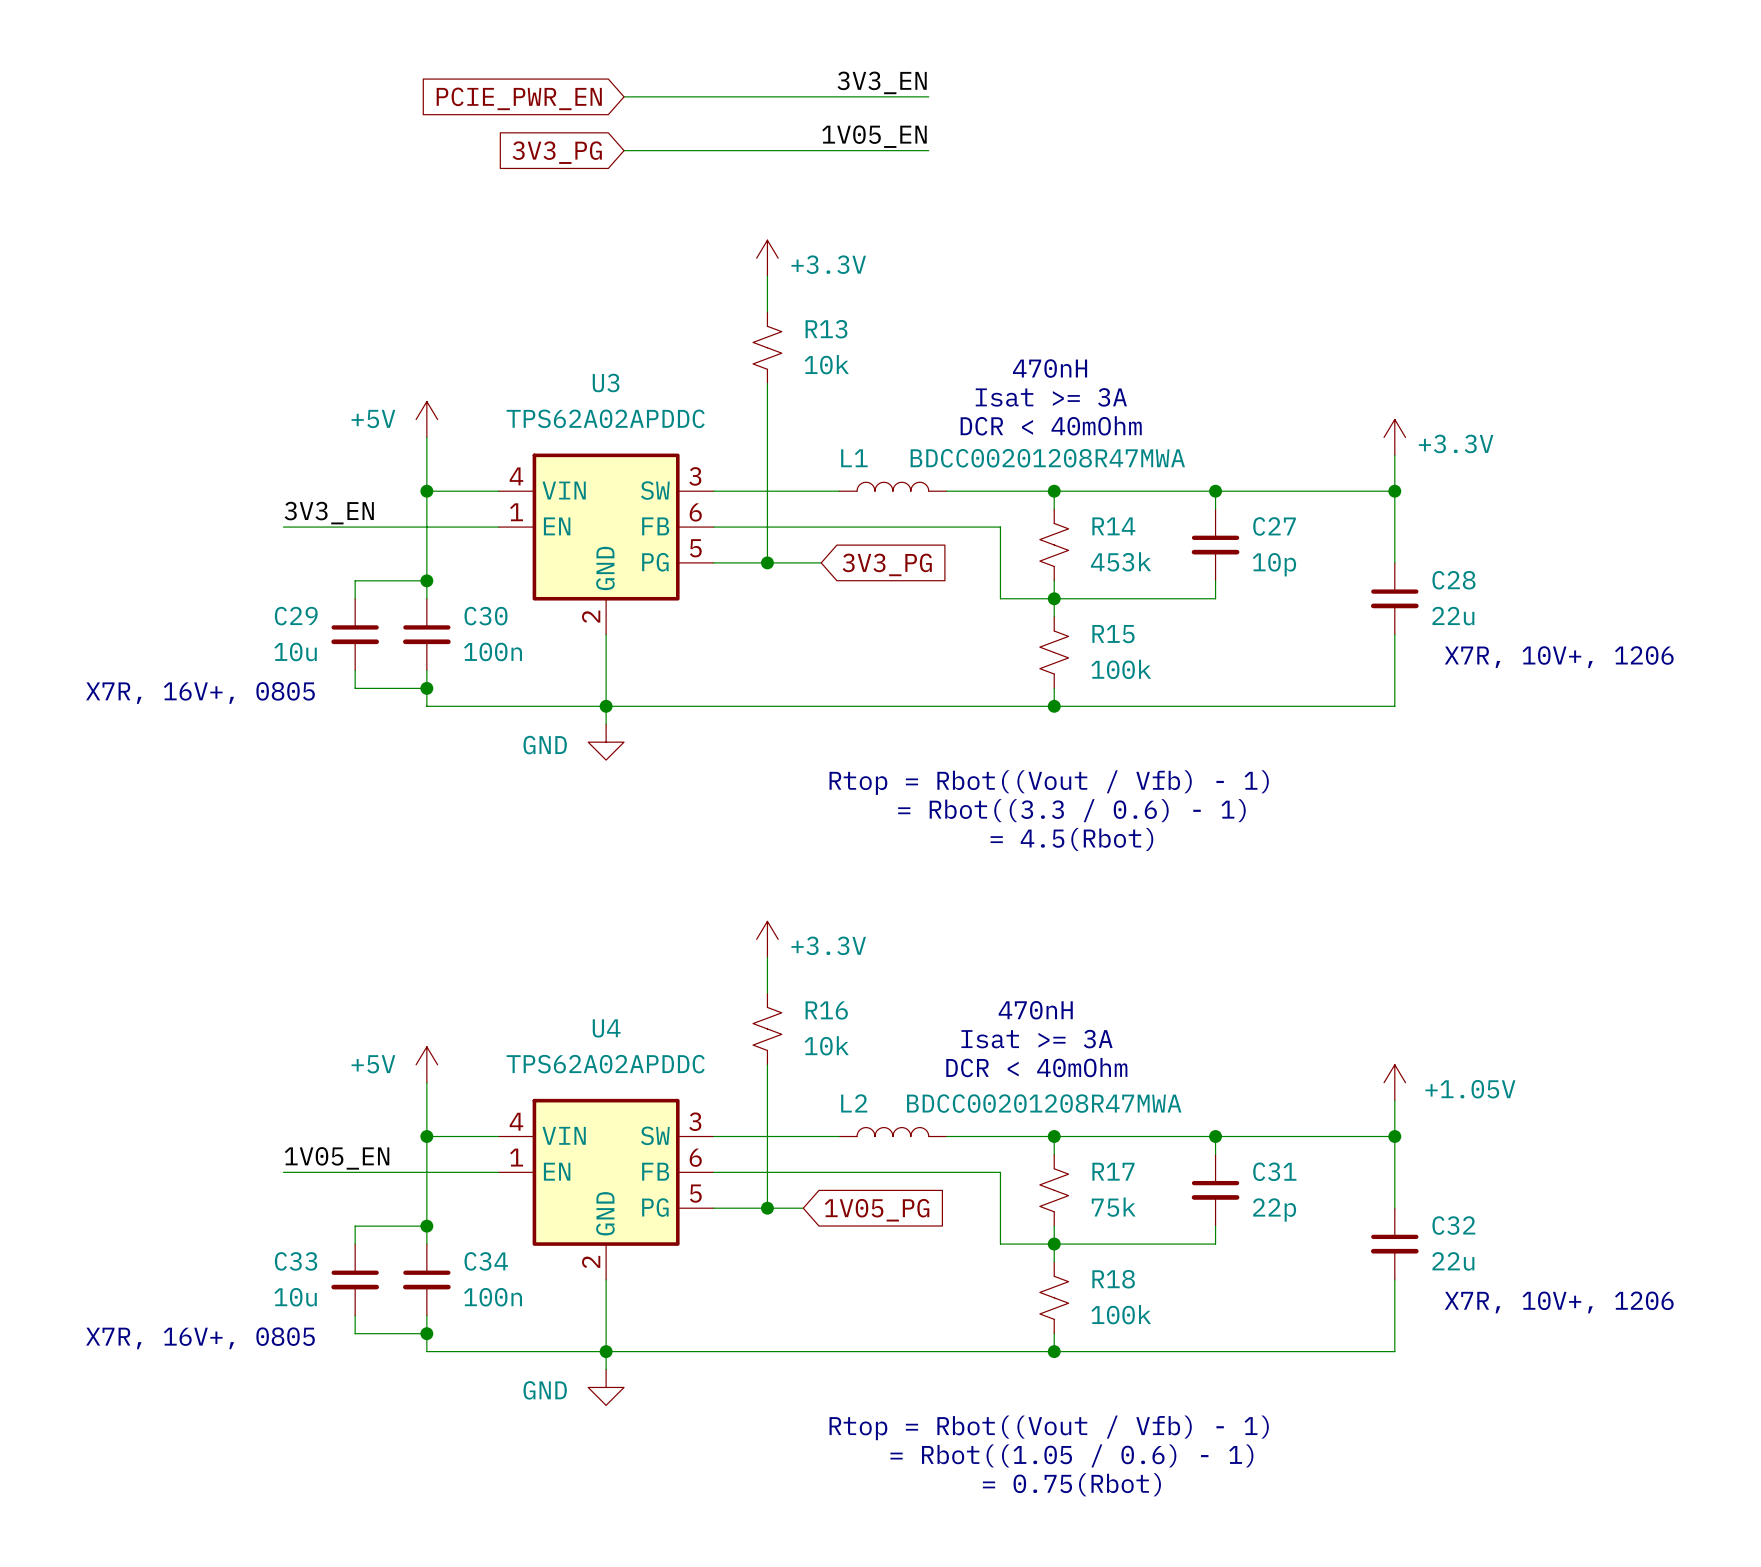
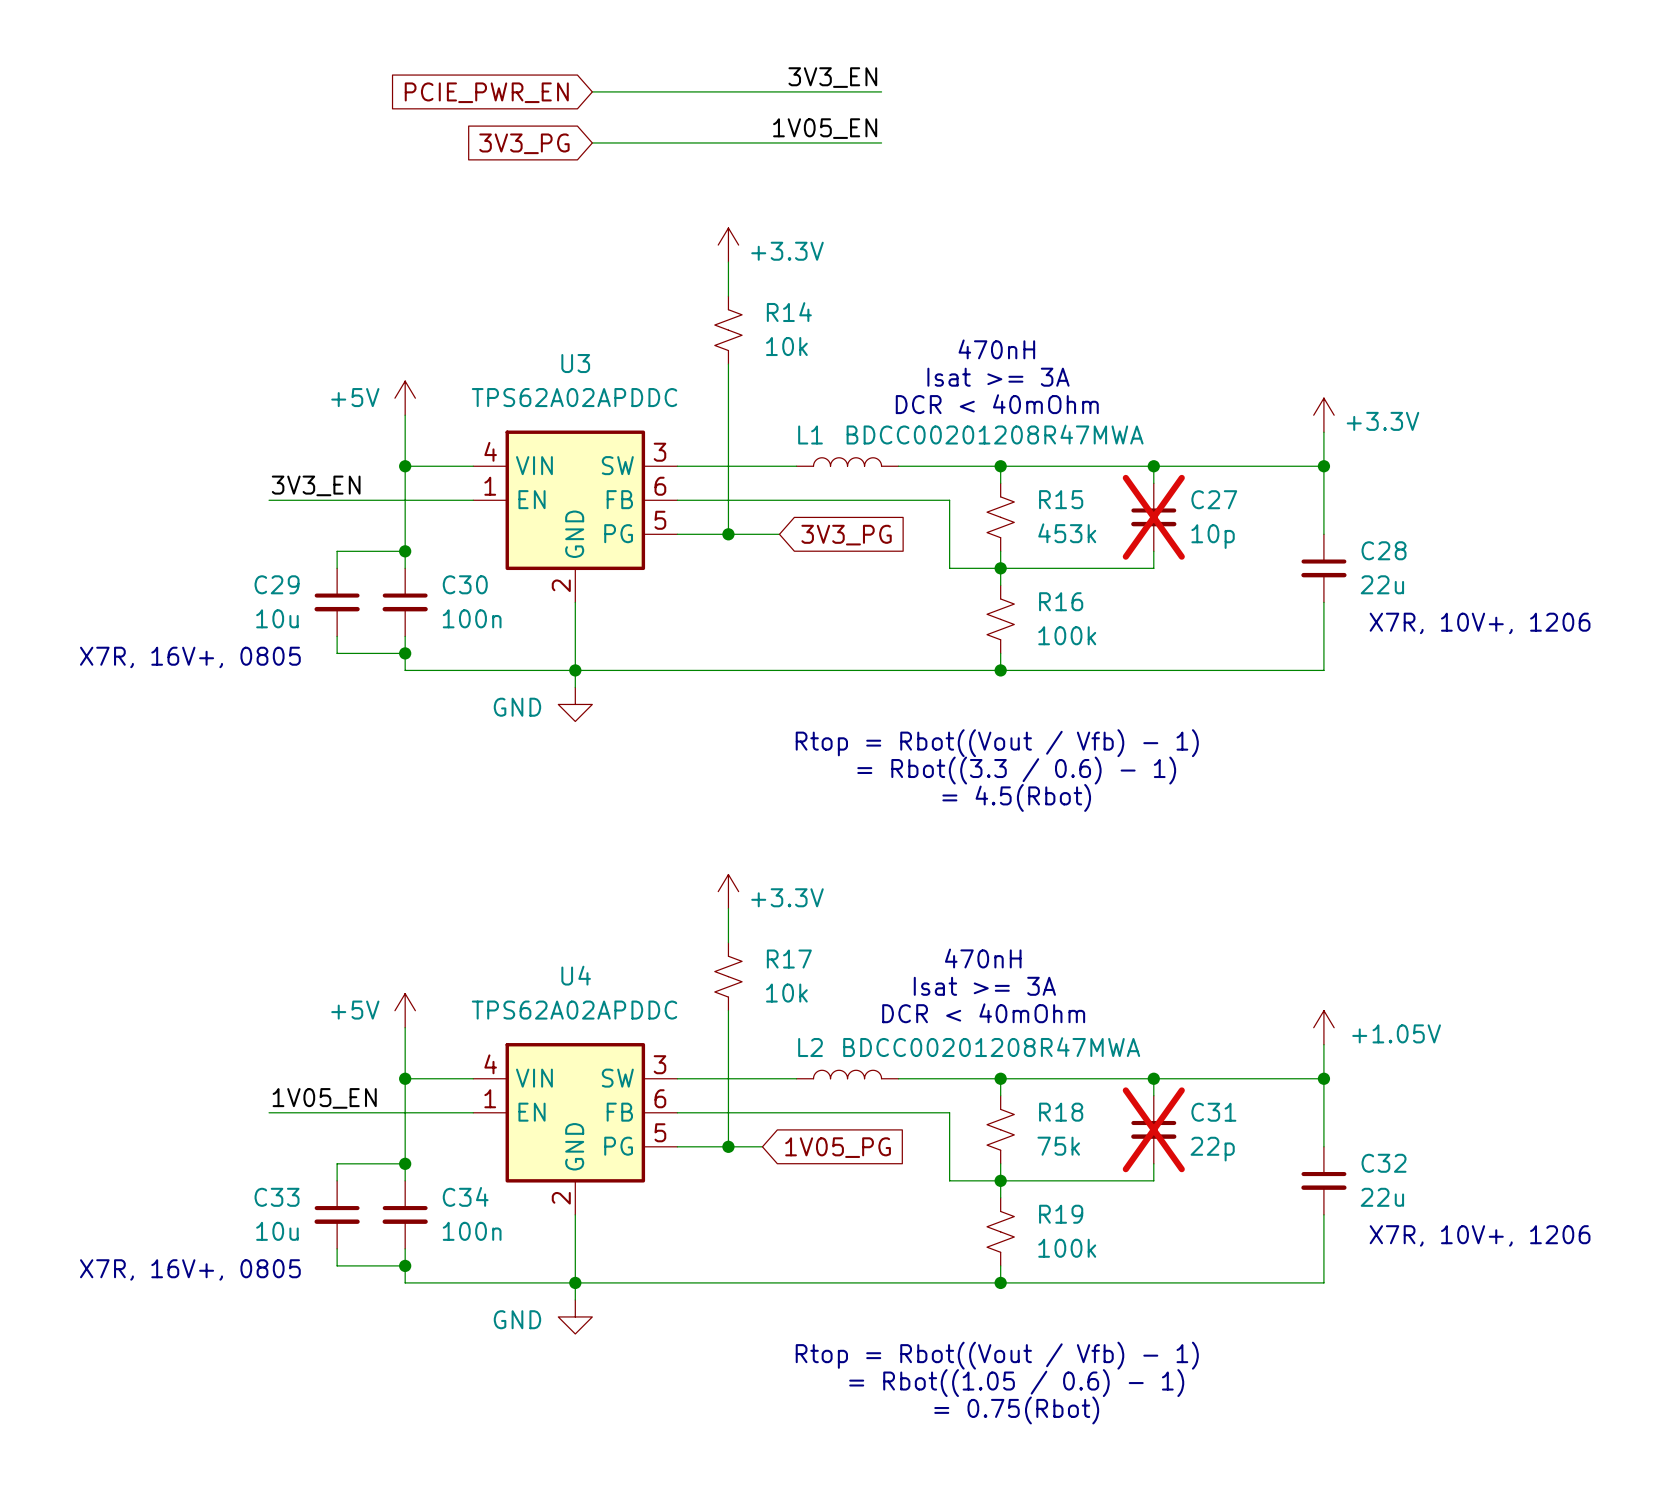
R13 name: R13 (826, 329) -> R14 (789, 312)
R14 name: R14 (1113, 526) -> R15 (1061, 499)
C27 do-not-place cross: none -> (1153, 517)
R15 name: R15 (1113, 634) -> R16 (1061, 601)
R16 name: R16 (826, 1010) -> R17 (789, 959)
R17 name: R17 (1113, 1171) -> R18 (1061, 1112)
C31 do-not-place cross: none -> (1153, 1129)
R18 name: R18 (1113, 1279) -> R19 (1061, 1214)

